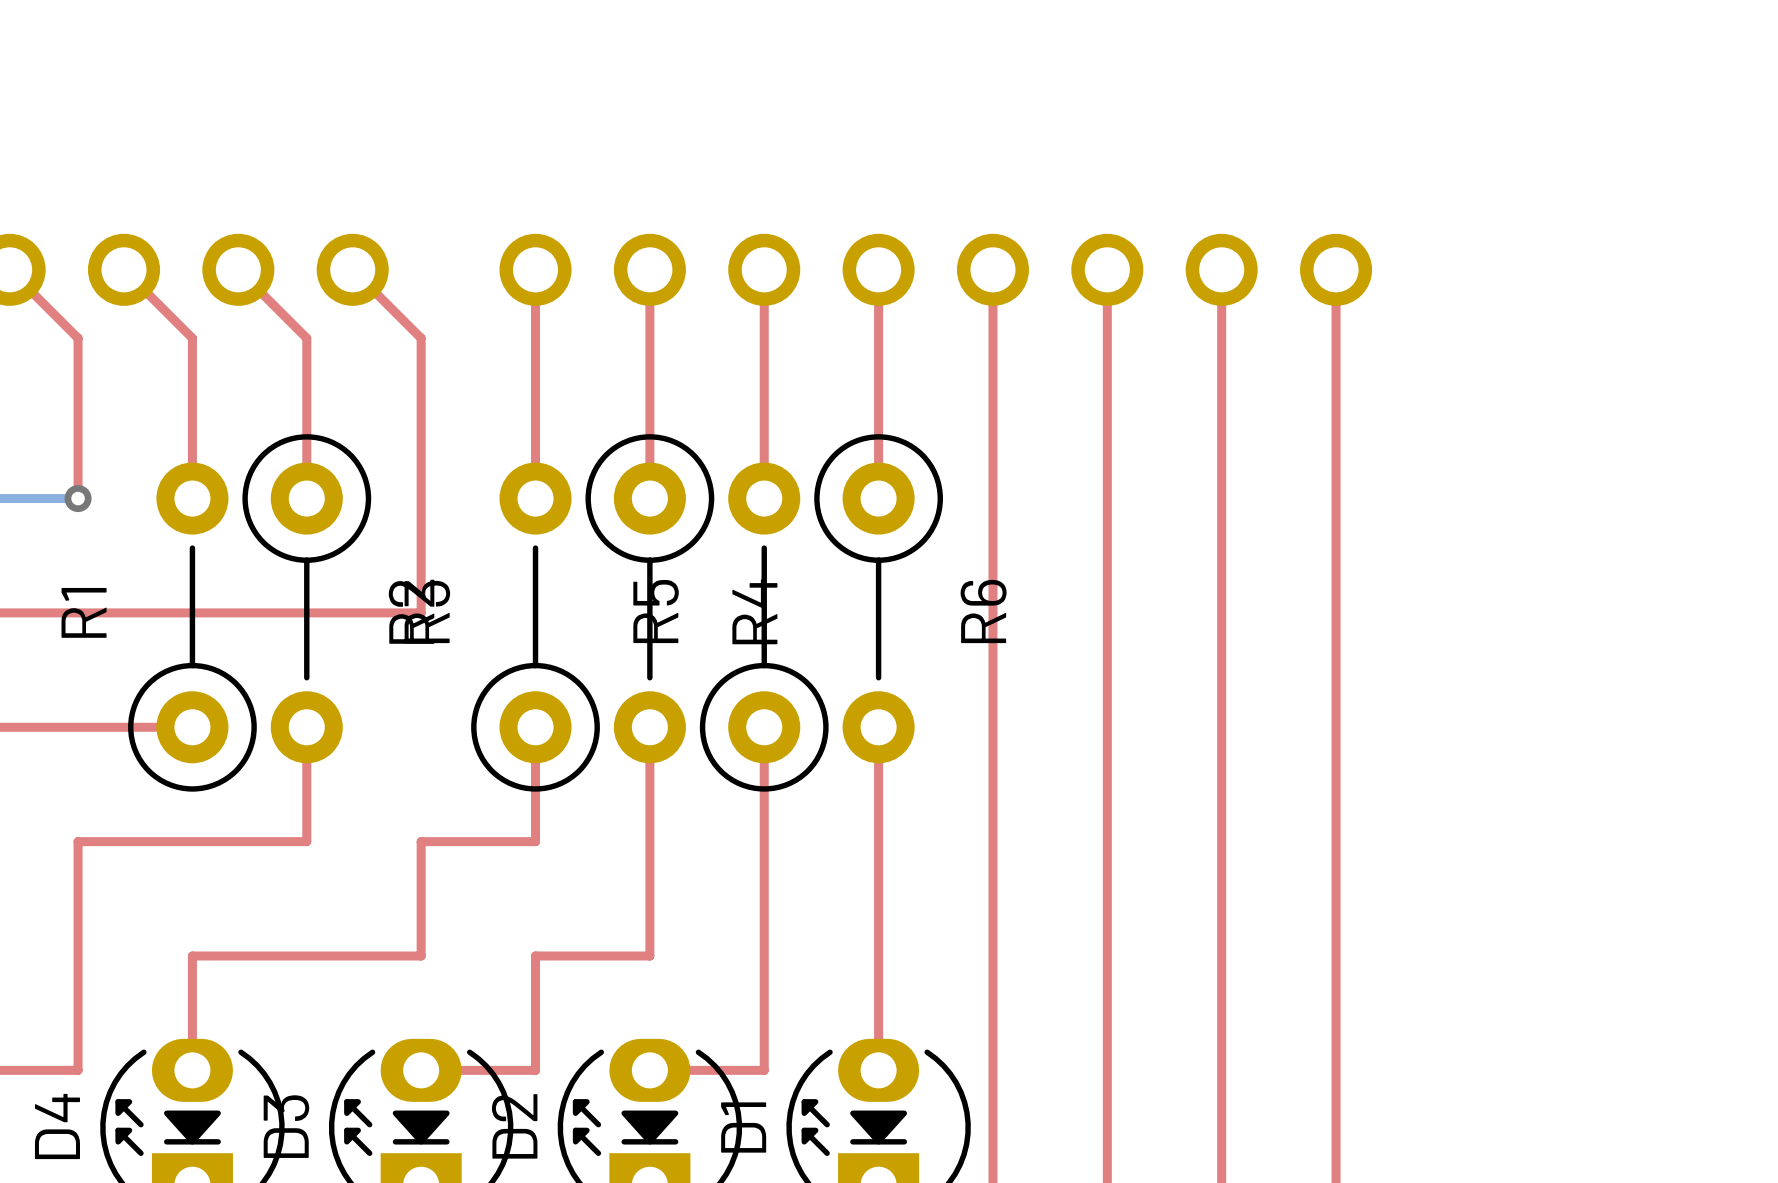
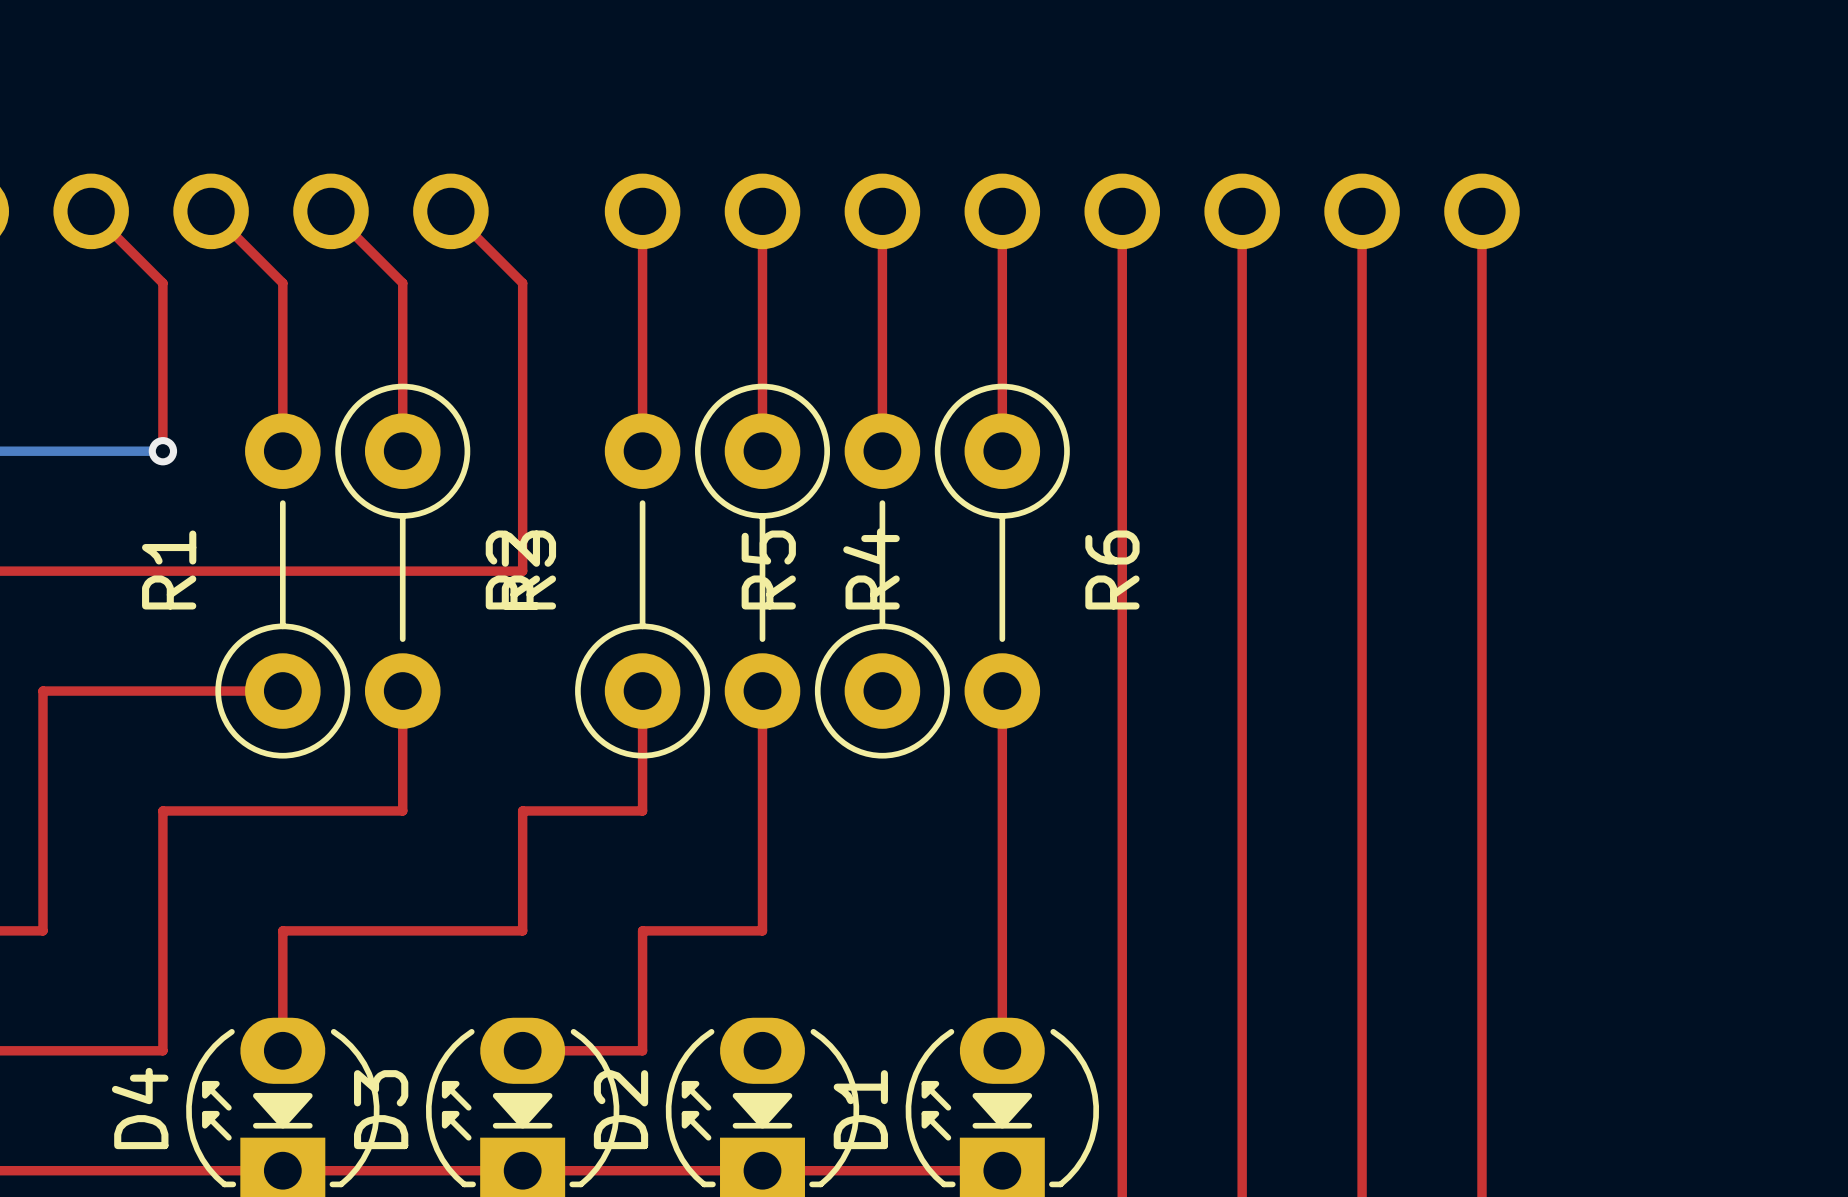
top track: (764, 727) (764, 1070) (649, 1070) -> none

